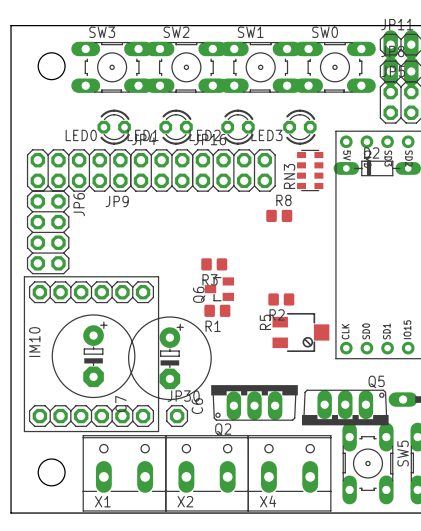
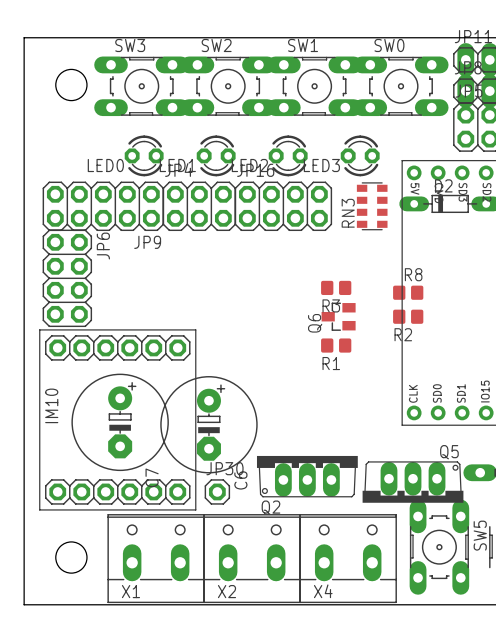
R8 position: (279, 215) -> (408, 292)
R3 position: (214, 264) -> (336, 287)
Q6 position: (219, 289) -> (338, 316)
R2 position: (281, 299) -> (408, 316)
R1 position: (217, 310) -> (336, 345)
R5: (300, 332) -> none

